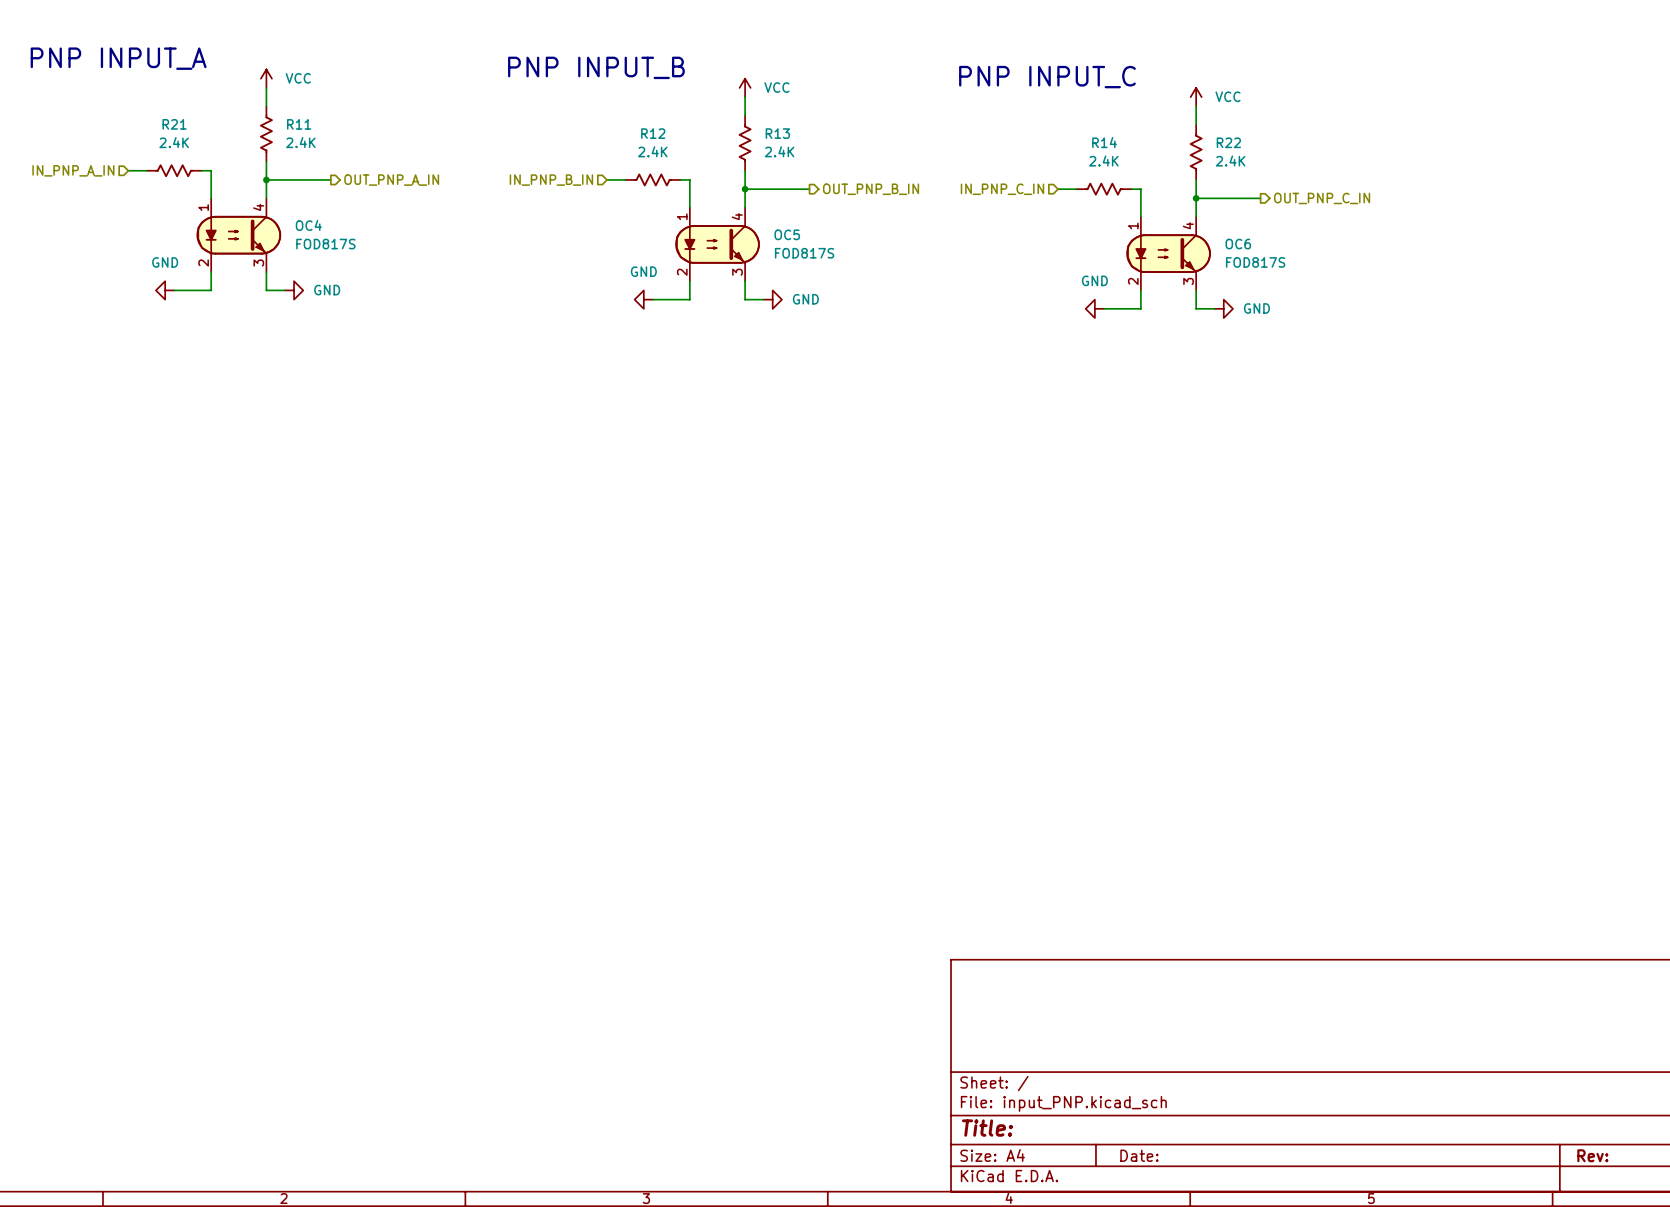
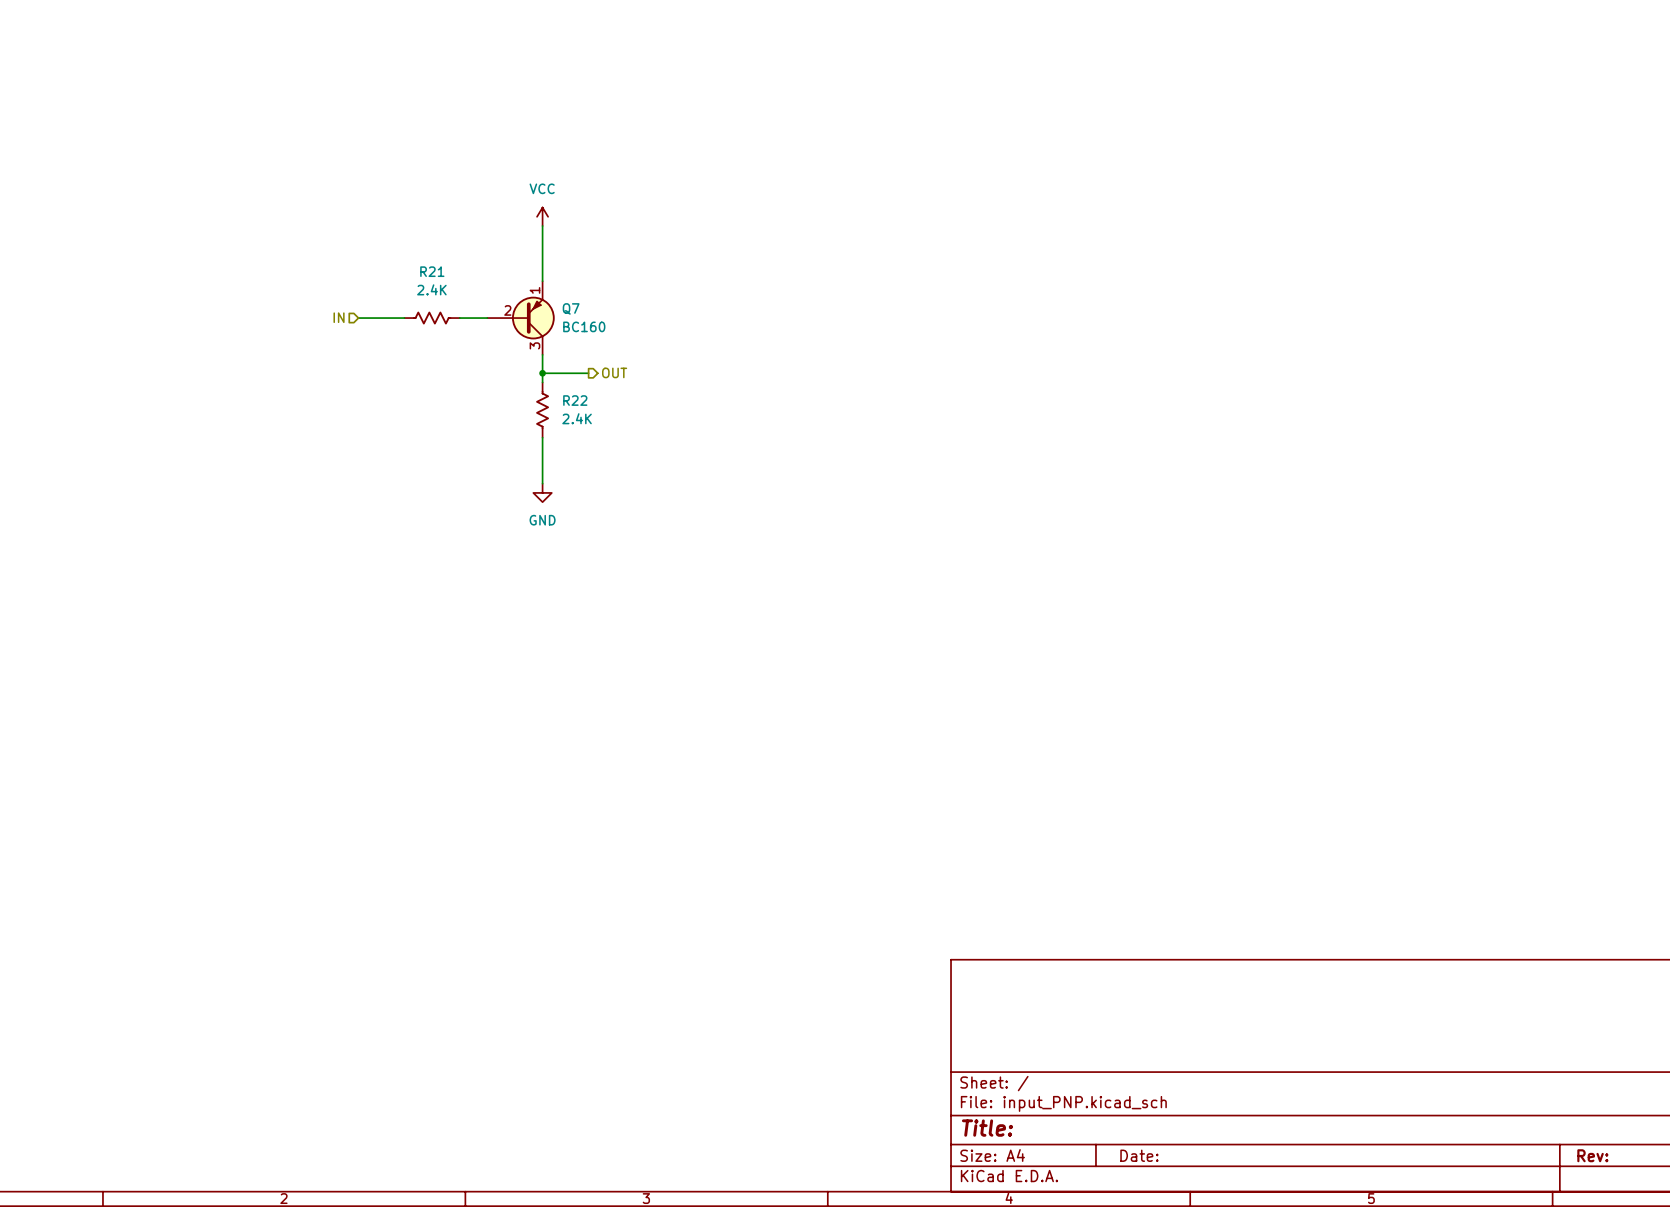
text: PNP INPUT_A (118, 58) -> none
text: PNP INPUT_B (596, 67) -> none
text: PNP INPUT_C (1047, 77) -> none
power symbol: VCC (266, 78) -> none
wire: (266, 87) (266, 106) -> none
power symbol: VCC (745, 87) -> none
wire: (745, 97) (745, 115) -> none
power symbol: VCC (1196, 97) -> none
wire: (1196, 106) (1196, 124) -> none
R11: 2.4K (266, 133) -> none
R13: 2.4K (745, 143) -> none
R22 position: (1196, 152) -> (542, 410)
wire: (266, 161) (266, 198) -> none
hierarchical label: IN_PNP_A_IN (73, 170) -> none
wire: (128, 170) (146, 170) -> none
R21 position: (174, 170) -> (432, 318)
wire: (201, 170) (211, 170) (211, 198) -> none
wire: (745, 170) (745, 207) -> none
wire: (266, 179) (330, 179) -> none
junction: (266, 179) -> none
wire: (607, 179) (625, 179) -> none
R12: 2.4K (653, 179) -> none
wire: (680, 179) (689, 179) (689, 207) -> none
wire: (1196, 179) (1196, 216) -> none
hierarchical label: OUT_PNP_A_IN (391, 180) -> none
hierarchical label: IN_PNP_B_IN (551, 180) -> none
wire: (745, 189) (809, 189) -> none
junction: (745, 189) -> none
hierarchical label: OUT_PNP_B_IN (871, 189) -> none
hierarchical label: IN_PNP_C_IN (1002, 189) -> none
wire: (1058, 189) (1076, 189) -> none
R14: 2.4K (1104, 189) -> none
wire: (1131, 189) (1140, 189) (1140, 216) -> none
wire: (1196, 198) (1260, 198) -> none
junction: (1196, 198) -> none
hierarchical label: OUT_PNP_C_IN (1322, 198) -> none
power symbol: none -> VCC (542, 216)
wire: none -> (542, 225) (542, 281)
OC4: FOD817S (238, 235) -> none
OC5: FOD817S (717, 244) -> none
OC6: FOD817S (1168, 253) -> none
wire: (211, 272) (211, 290) (174, 290) -> none
wire: (266, 272) (266, 290) (284, 290) -> none
wire: (689, 281) (689, 299) (653, 299) -> none
wire: (745, 281) (745, 299) (763, 299) -> none
power symbol: GND (165, 290) -> none
power symbol: GND (294, 290) -> none
wire: (1140, 290) (1140, 308) (1104, 308) -> none
wire: (1196, 290) (1196, 308) (1214, 308) -> none
power symbol: GND (643, 299) -> none
power symbol: GND (772, 299) -> none
power symbol: GND (1094, 308) -> none
power symbol: GND (1223, 308) -> none
hierarchical label: none -> IN (339, 317)
wire: none -> (358, 318) (404, 318)
wire: none -> (459, 318) (487, 318)
Q7: none -> BC160 (521, 318)
wire: none -> (542, 354) (542, 382)
hierarchical label: none -> OUT (614, 372)
wire: none -> (542, 373) (588, 373)
junction: none -> (542, 373)
wire: none -> (542, 437) (542, 483)
power symbol: none -> GND (542, 492)

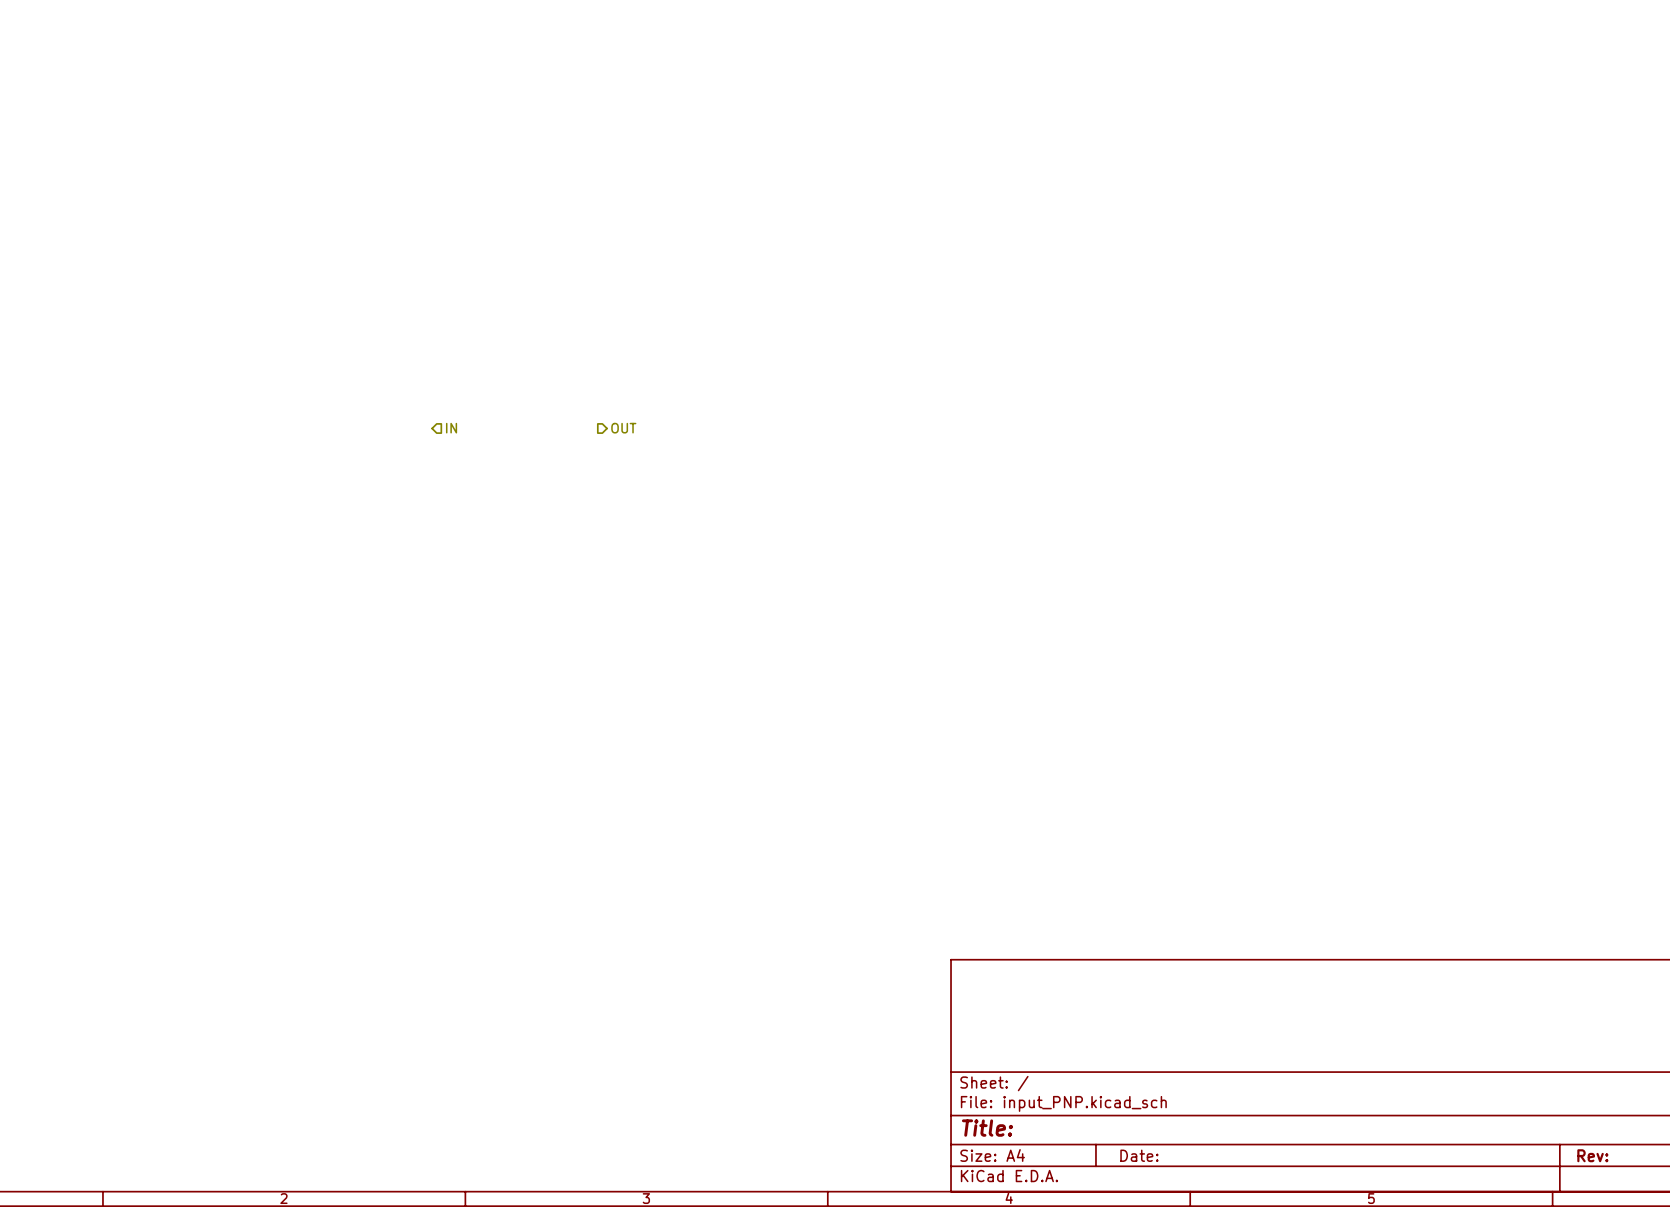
power symbol: VCC (542, 216) -> none
wire: (542, 225) (542, 281) -> none
hierarchical label rotation: 0° (339, 317) -> 180° (451, 428)
hierarchical label position: IN (339, 317) -> IN (451, 428)
wire: (358, 318) (404, 318) -> none
R21: 2.4K (432, 318) -> none
wire: (459, 318) (487, 318) -> none
Q7: BC160 (521, 318) -> none
wire: (542, 354) (542, 382) -> none
hierarchical label position: OUT (614, 372) -> OUT (623, 428)
wire: (542, 373) (588, 373) -> none
junction: (542, 373) -> none
R22: 2.4K (542, 410) -> none
wire: (542, 437) (542, 483) -> none
power symbol: GND (542, 492) -> none

